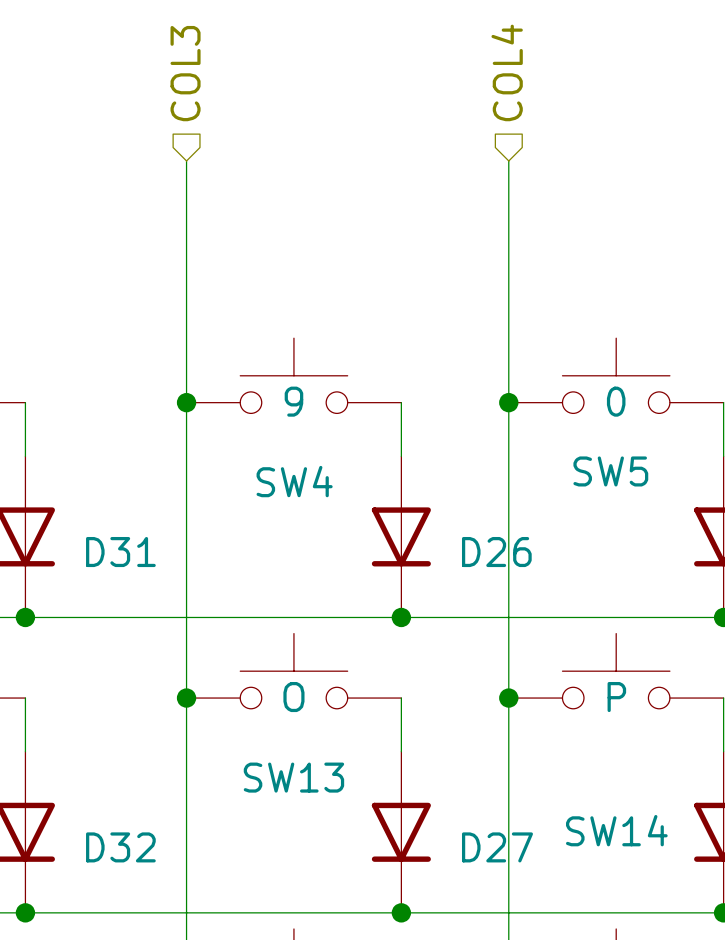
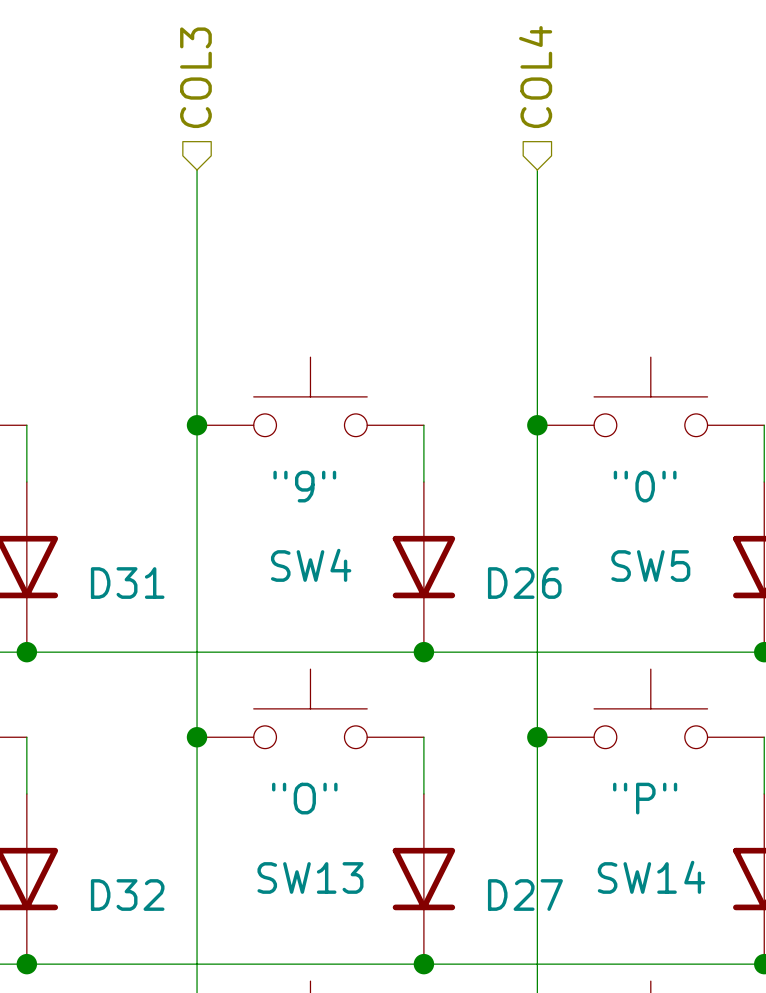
SW4 text: 9 (293, 401) -> none
SW5 text: 0 (616, 401) -> none
SW4 value: none -> "9" (304, 486)
SW5 value: none -> "0" (645, 486)
SW5 name position: SW5 (610, 471) -> SW5 (650, 566)
SW4 name position: SW4 (294, 481) -> SW4 (311, 565)
SW13 text: O (293, 697) -> none
SW14 text: P (616, 697) -> none
SW13 value: none -> "O" (304, 798)
SW14 value: none -> "P" (645, 798)
SW13 name position: SW13 (293, 777) -> SW13 (310, 877)

